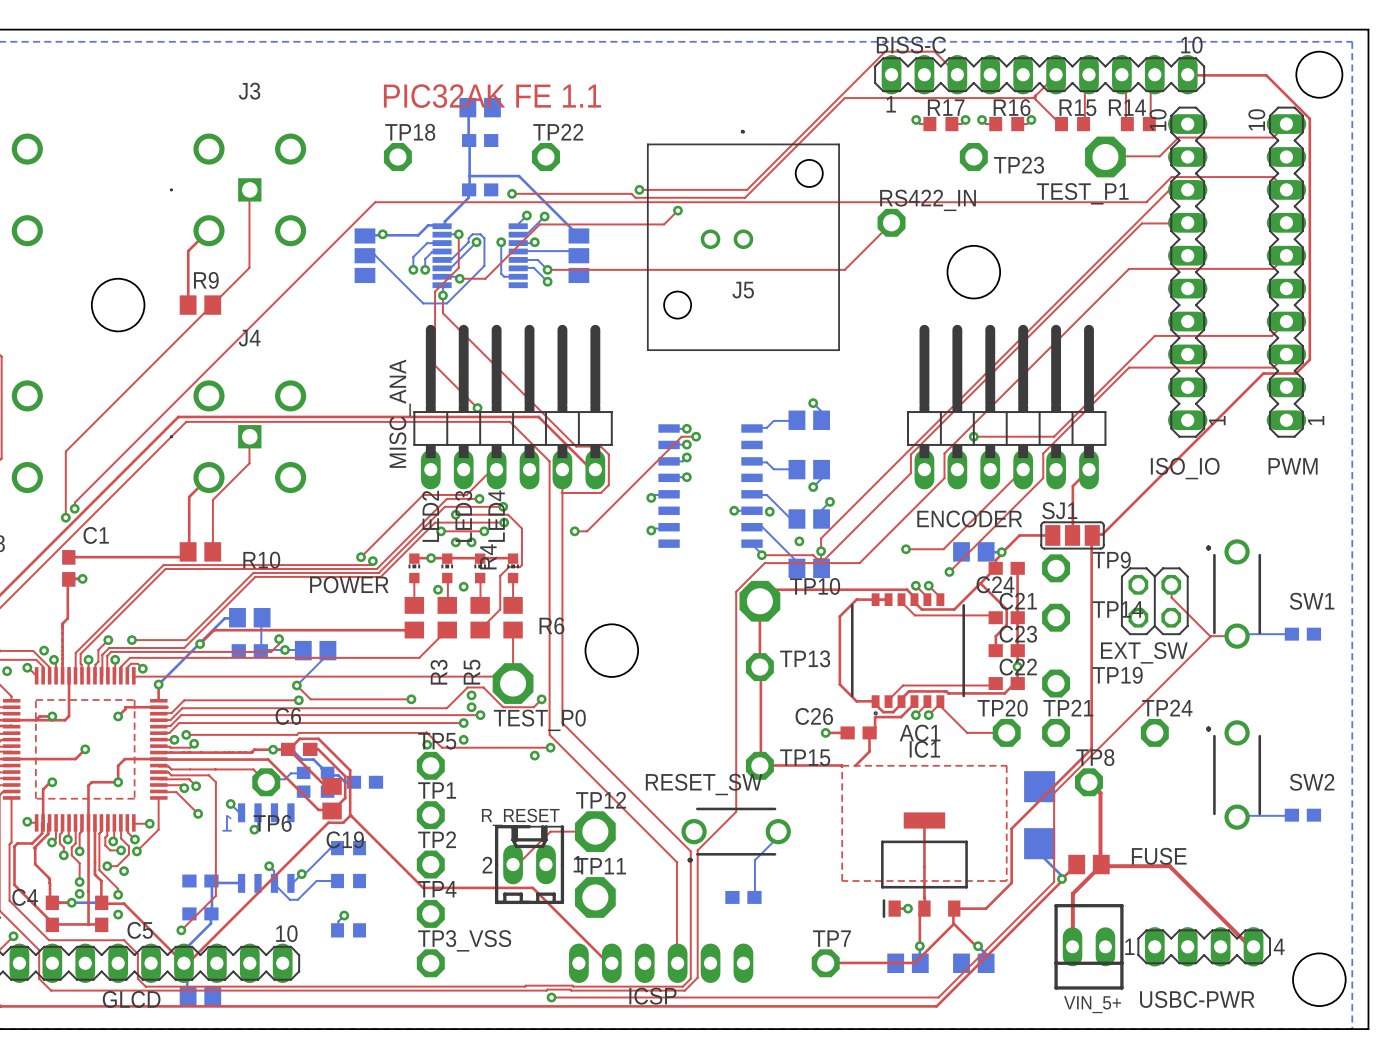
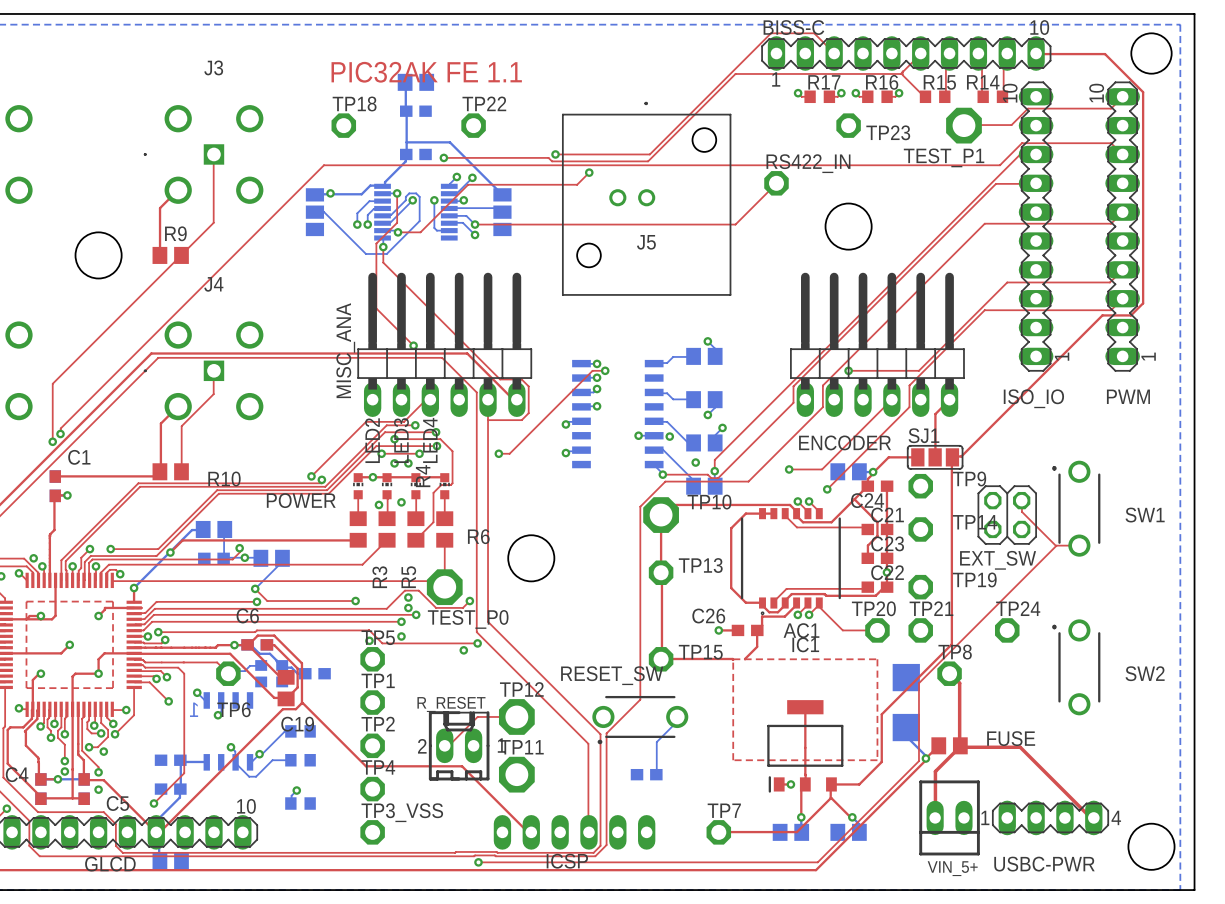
bottom track: (1291, 634) (1238, 634) (1237, 636) -> none
part: (1302, 634) -> none
bottom track: (1291, 815) (1237, 817) -> none
part: (1302, 815) -> none

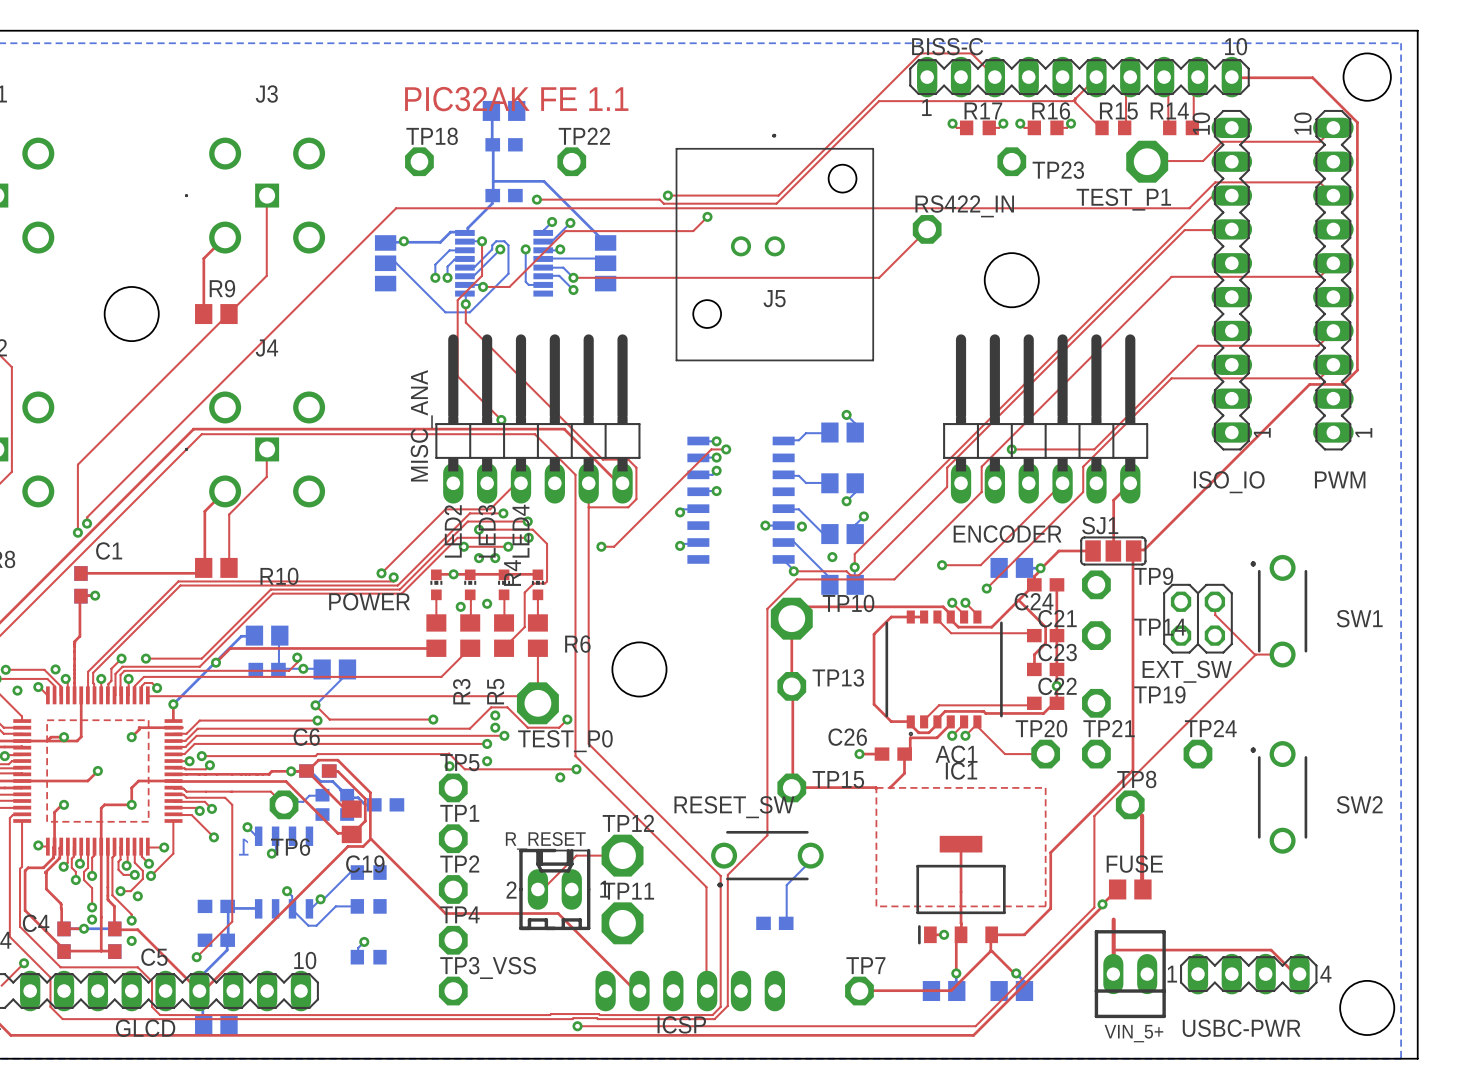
part: (906, 702) -> none
bottom track: (906, 727) (906, 736) (925, 755) (925, 758) -> none
FUSE name position: FUSE (1011, 738) -> FUSE (1134, 864)
top track: (935, 771) (960, 745) (1020, 747) (1090, 817) -> (1113, 950) (1271, 950) (1295, 973)

